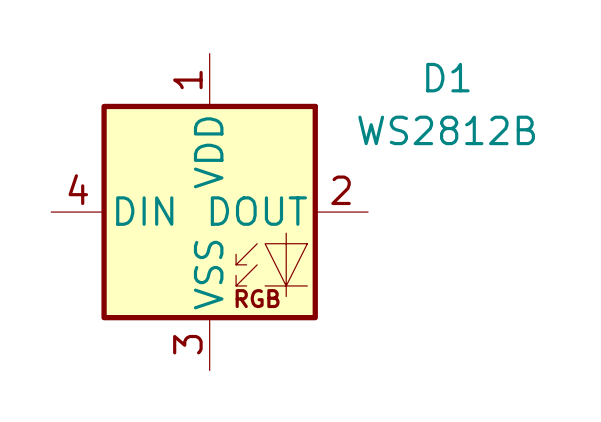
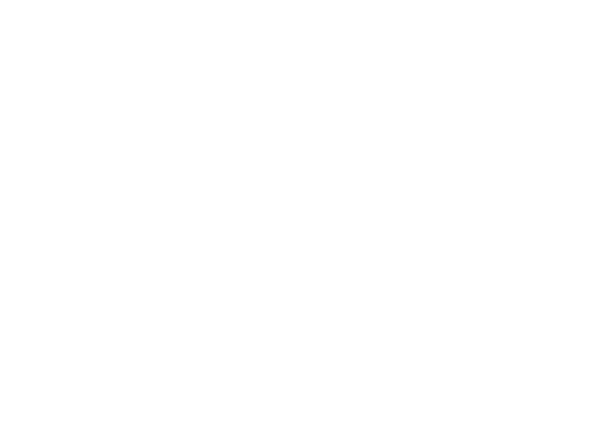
D1: WS2812B (209, 212) -> none

